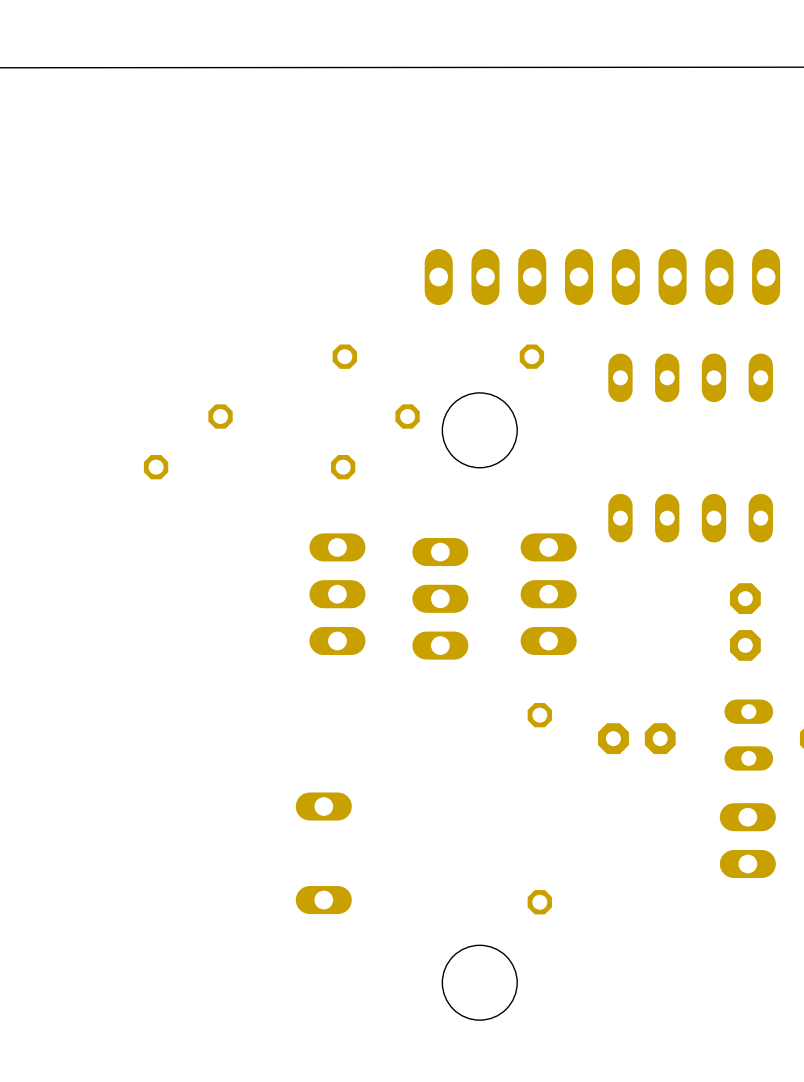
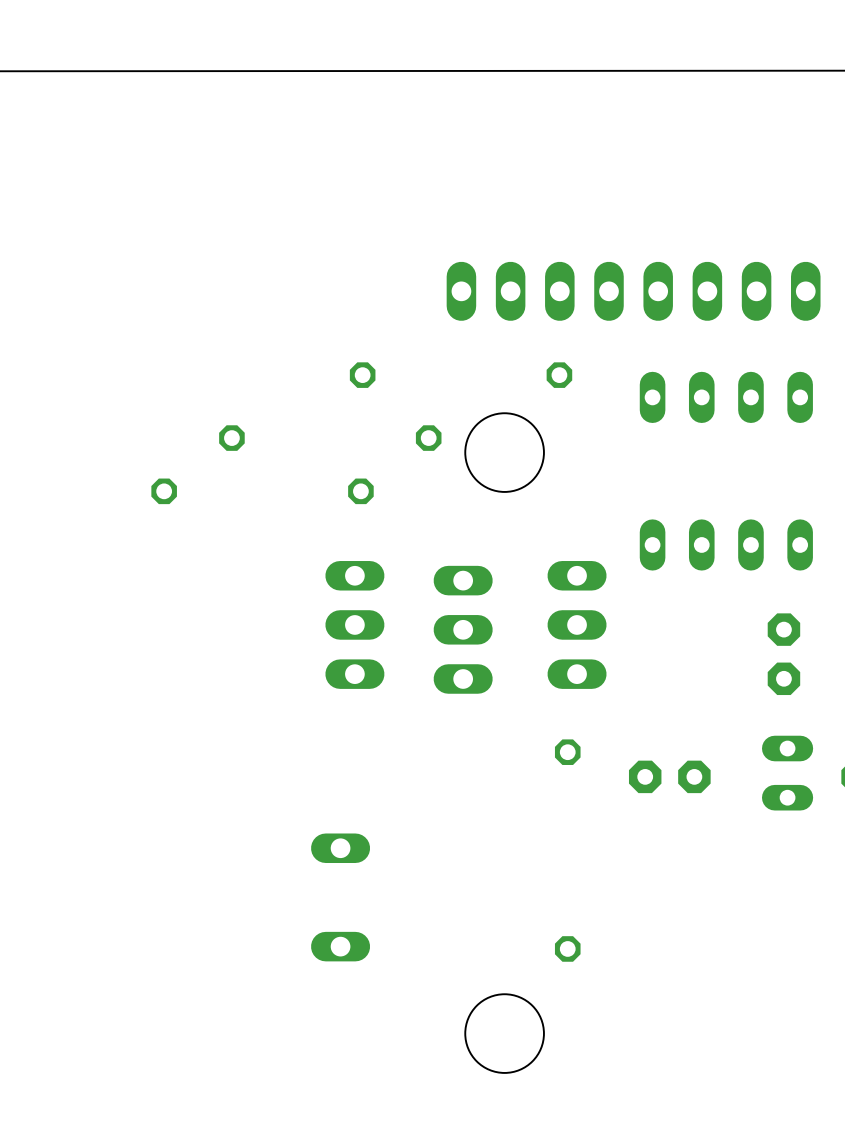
part: (747, 840) -> none

